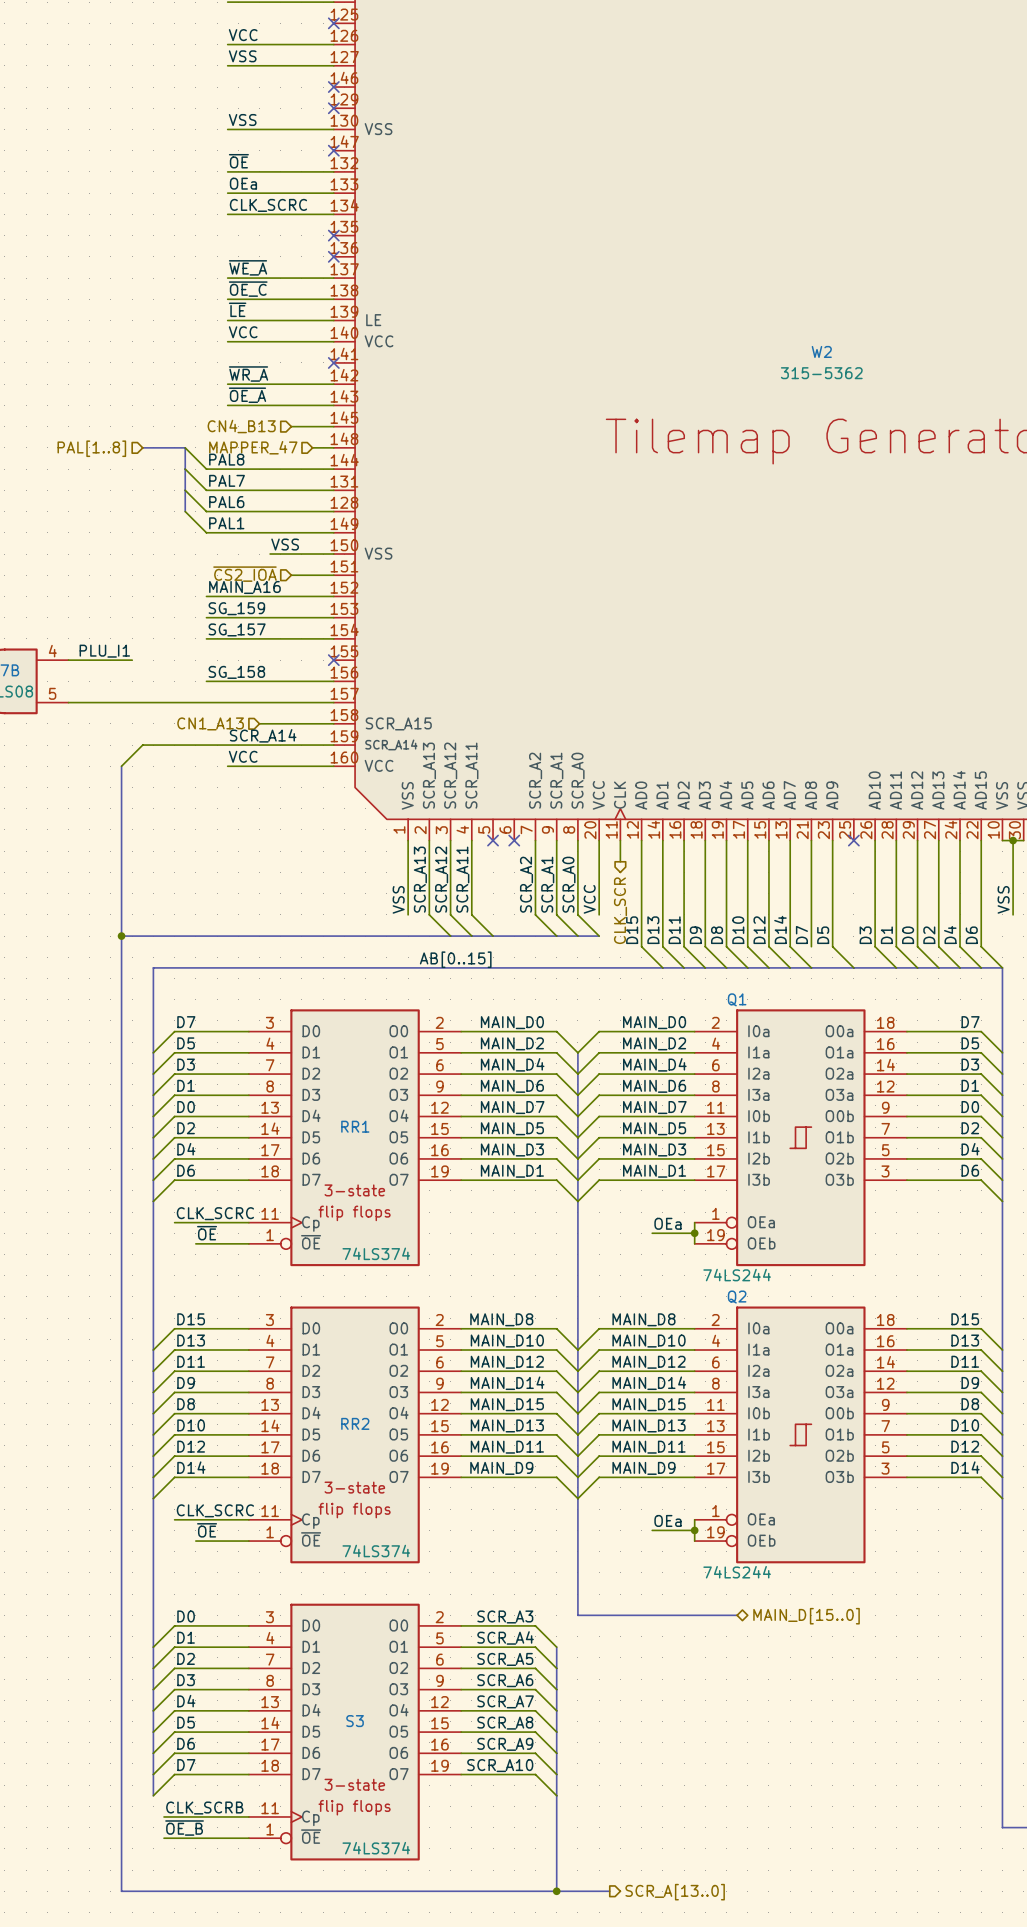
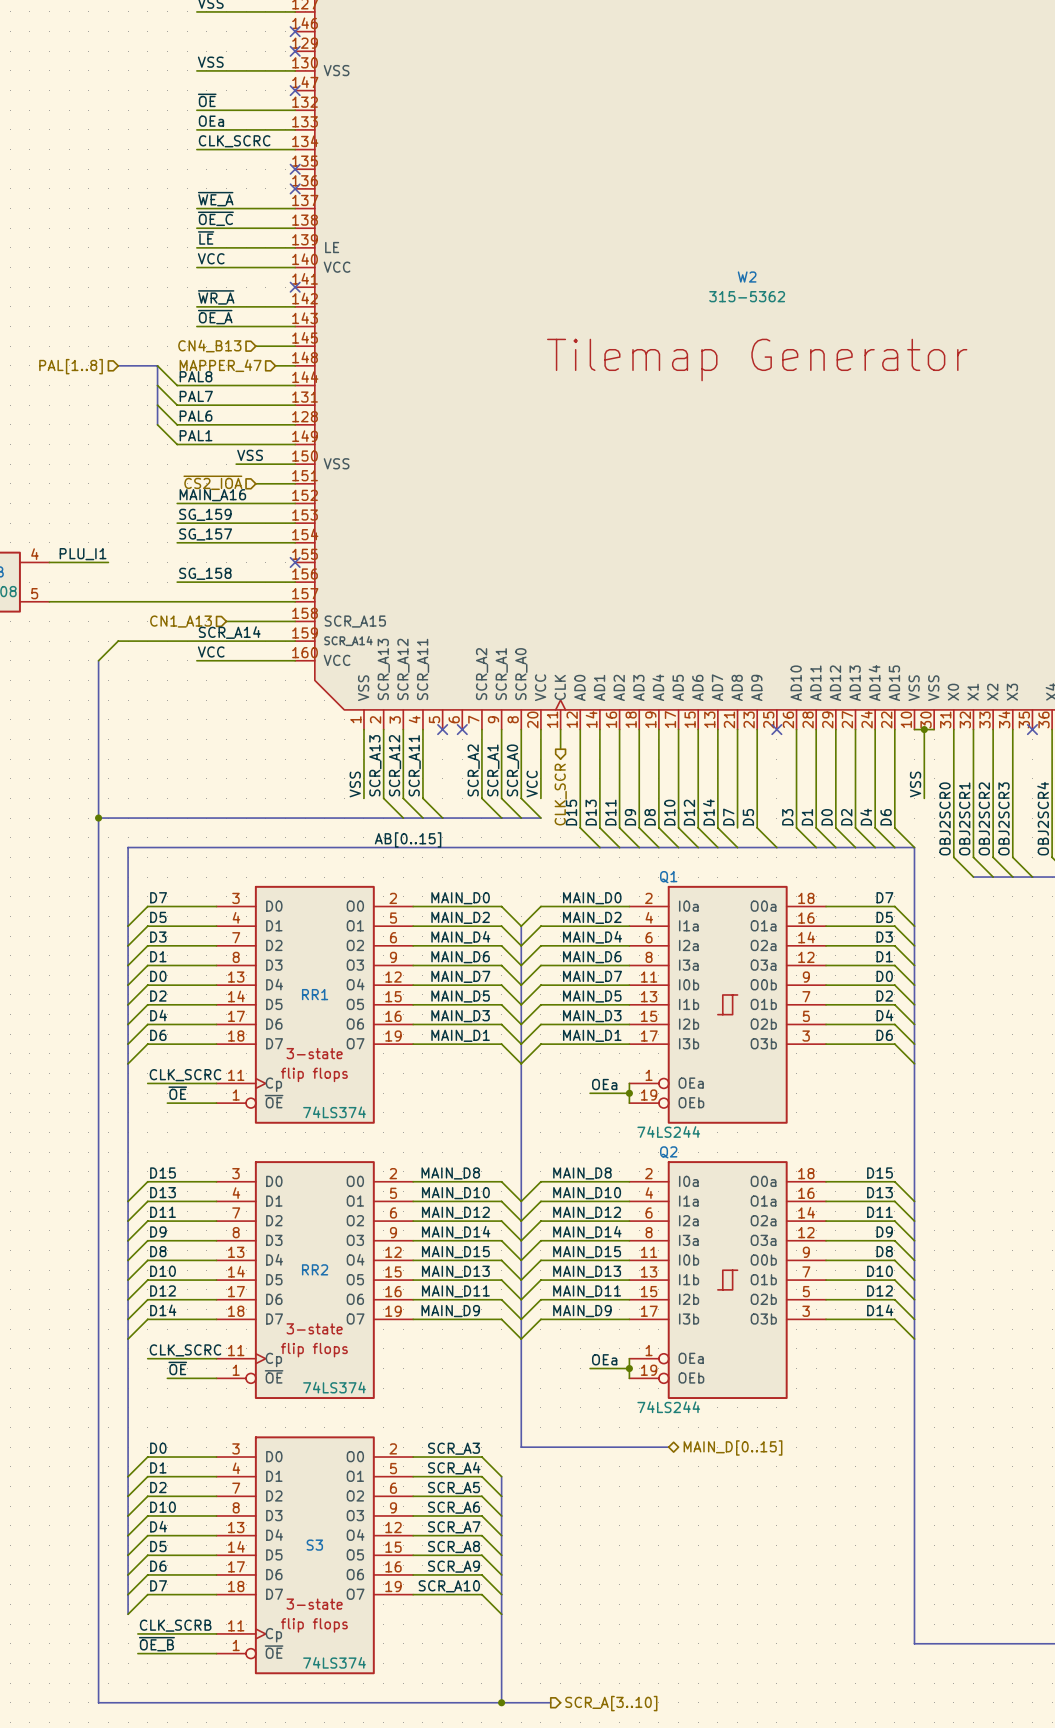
hierarchical label: MAIN_D[15..0] (806, 1616) -> MAIN_D[0..15] (733, 1447)
label: D3 (186, 1680) -> D10 (163, 1507)
hierarchical label: SCR_A[13..0] (675, 1892) -> SCR_A[3..10] (611, 1703)

